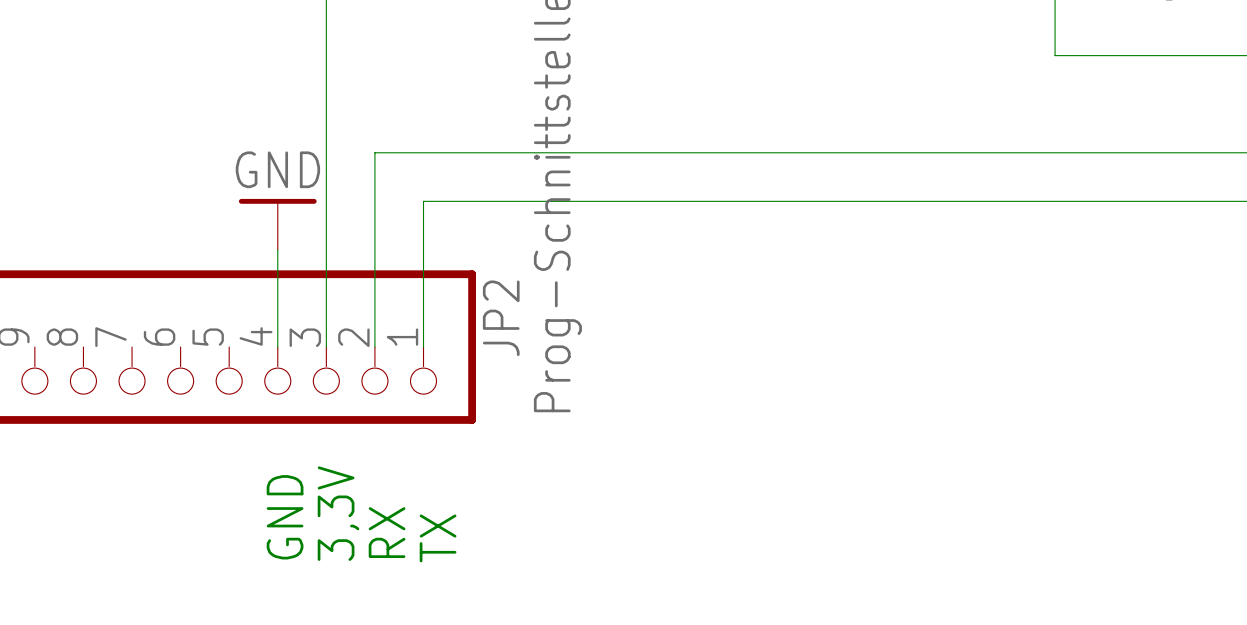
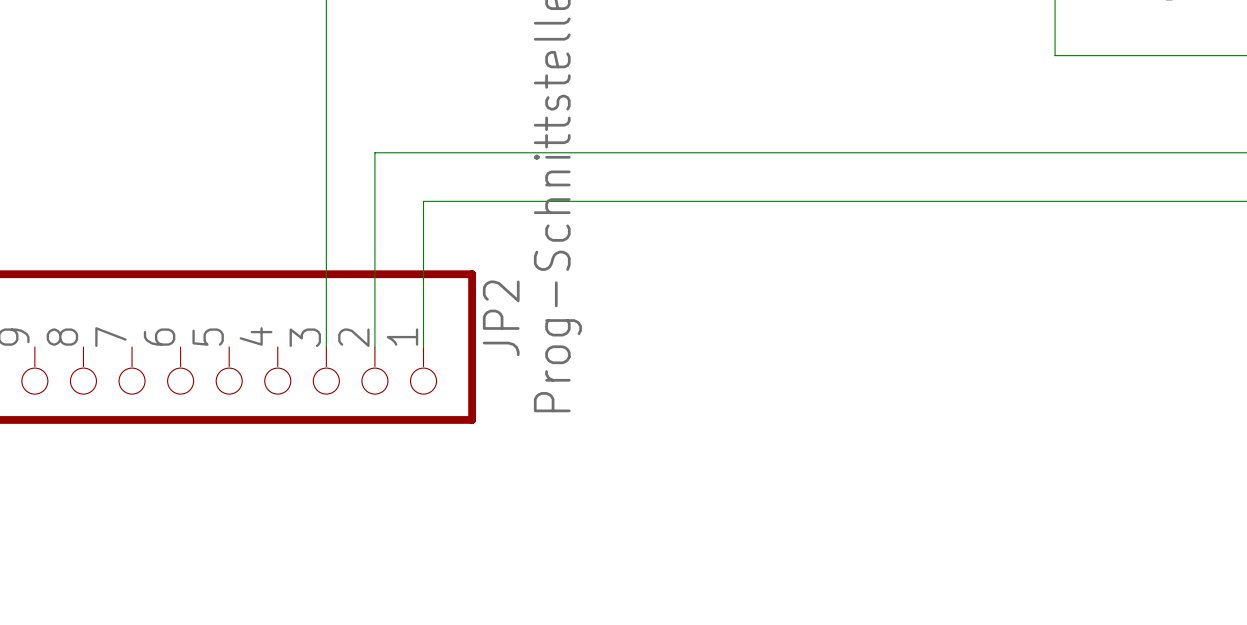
power symbol: GND (277, 224) -> none
wire: (277, 249) (277, 347) -> none
text: 3,3V (338, 513) -> none
text: GND (285, 517) -> none
text: RX (387, 532) -> none
text: TX (438, 538) -> none

